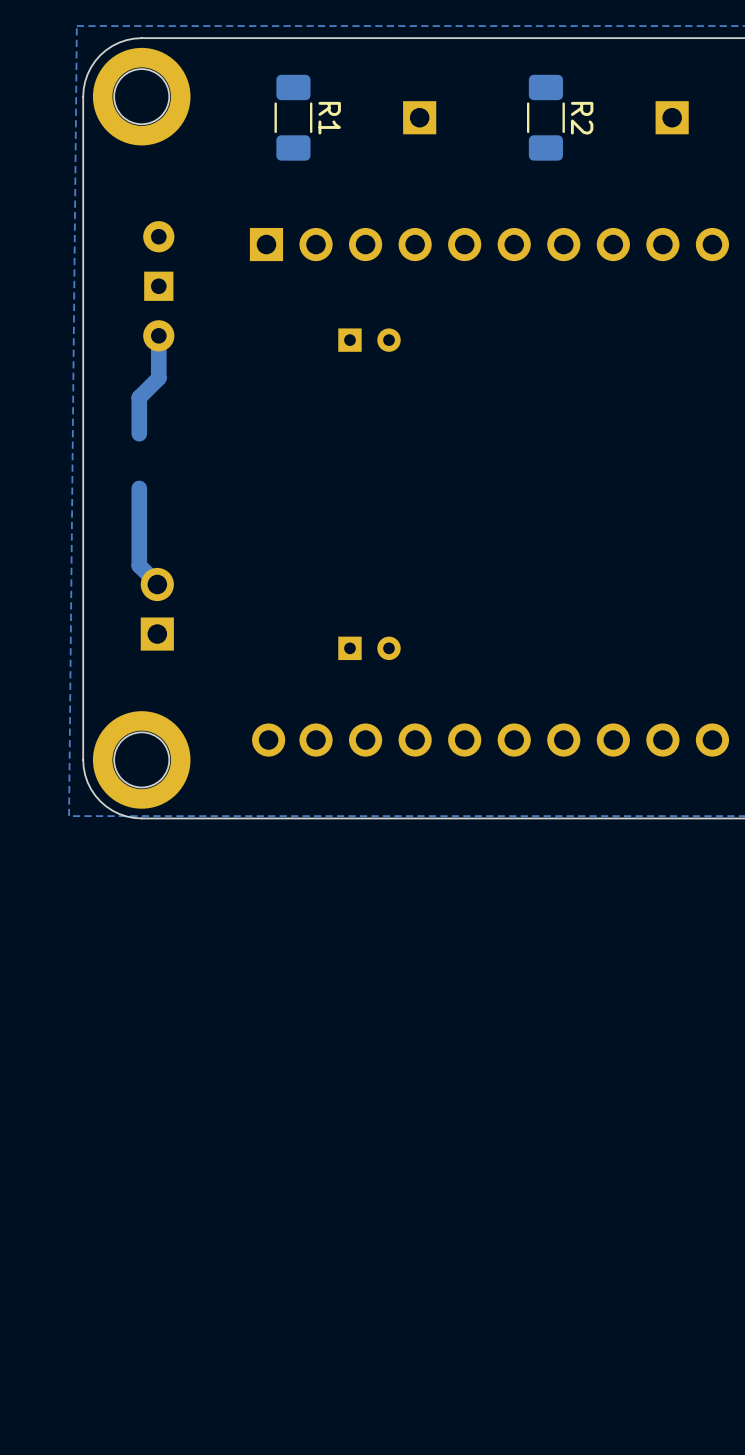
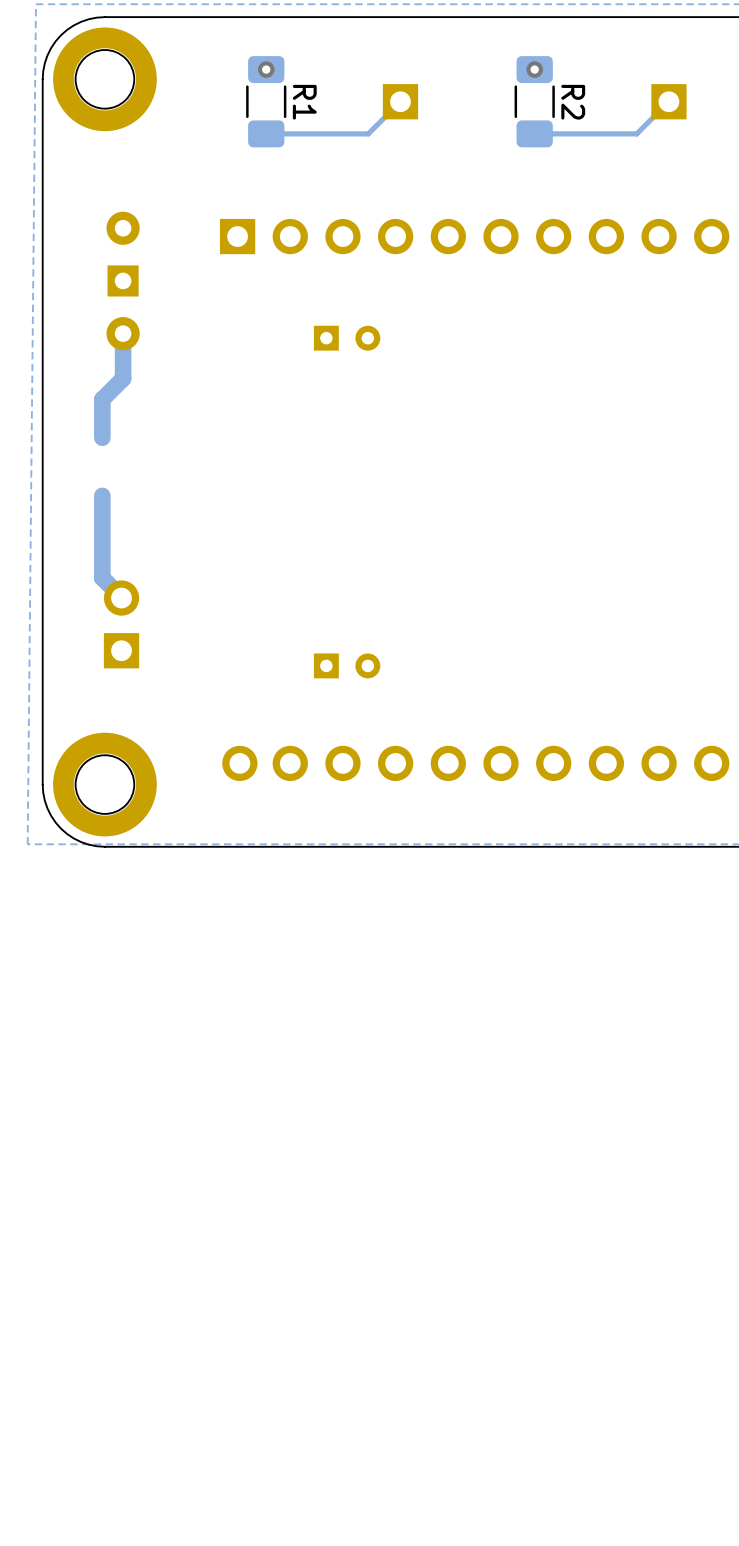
via: none -> (266, 69)
via: none -> (534, 69)
track: none -> (400, 101) (368, 133) (266, 133)
track: none -> (668, 101) (636, 133) (534, 133)

